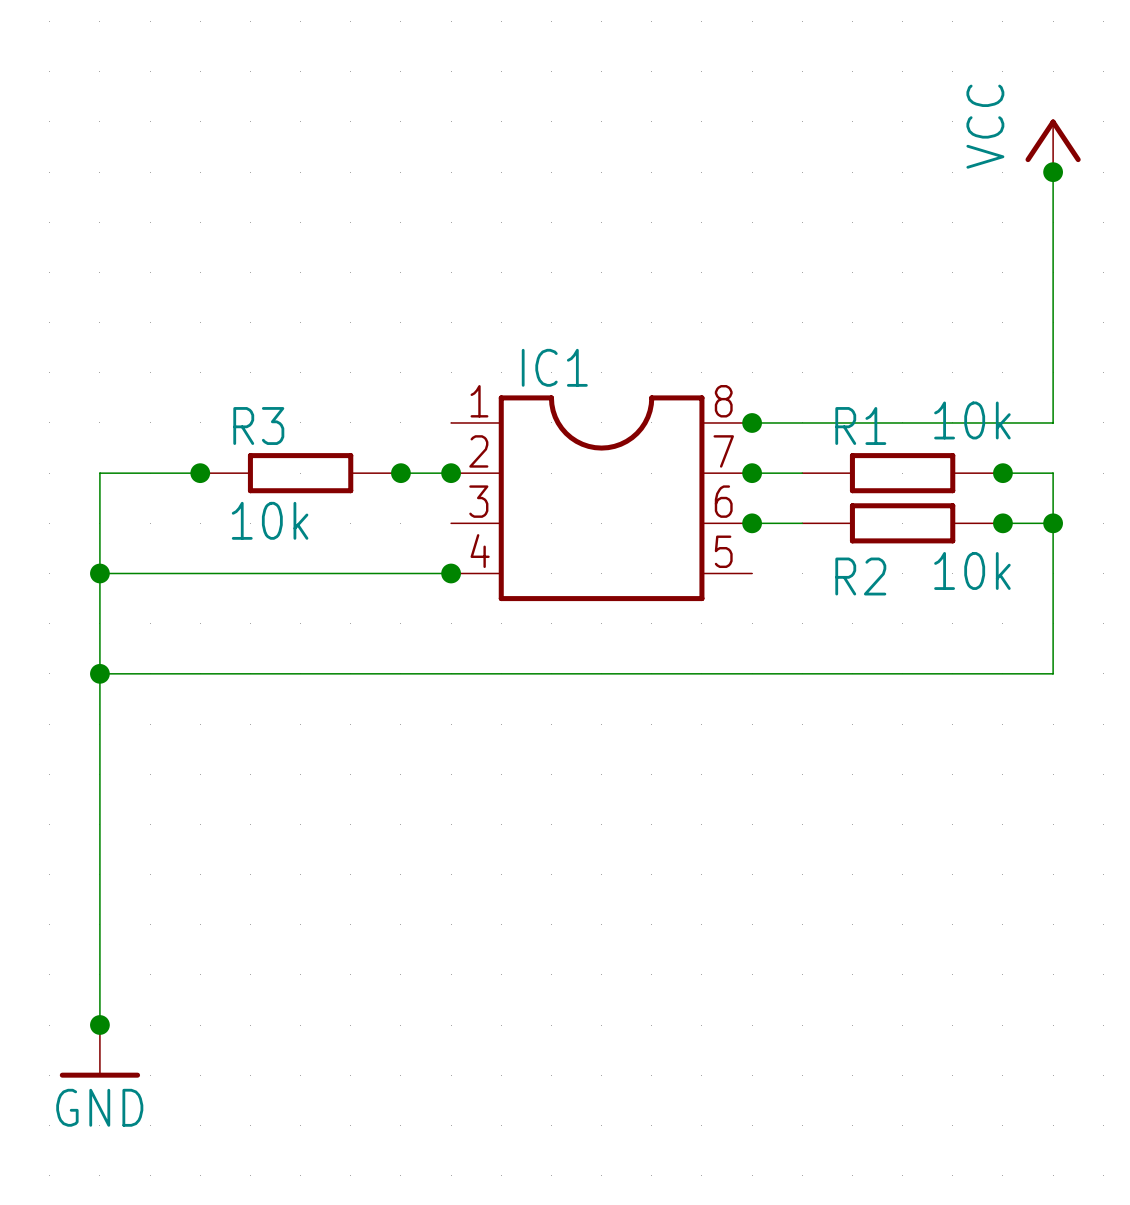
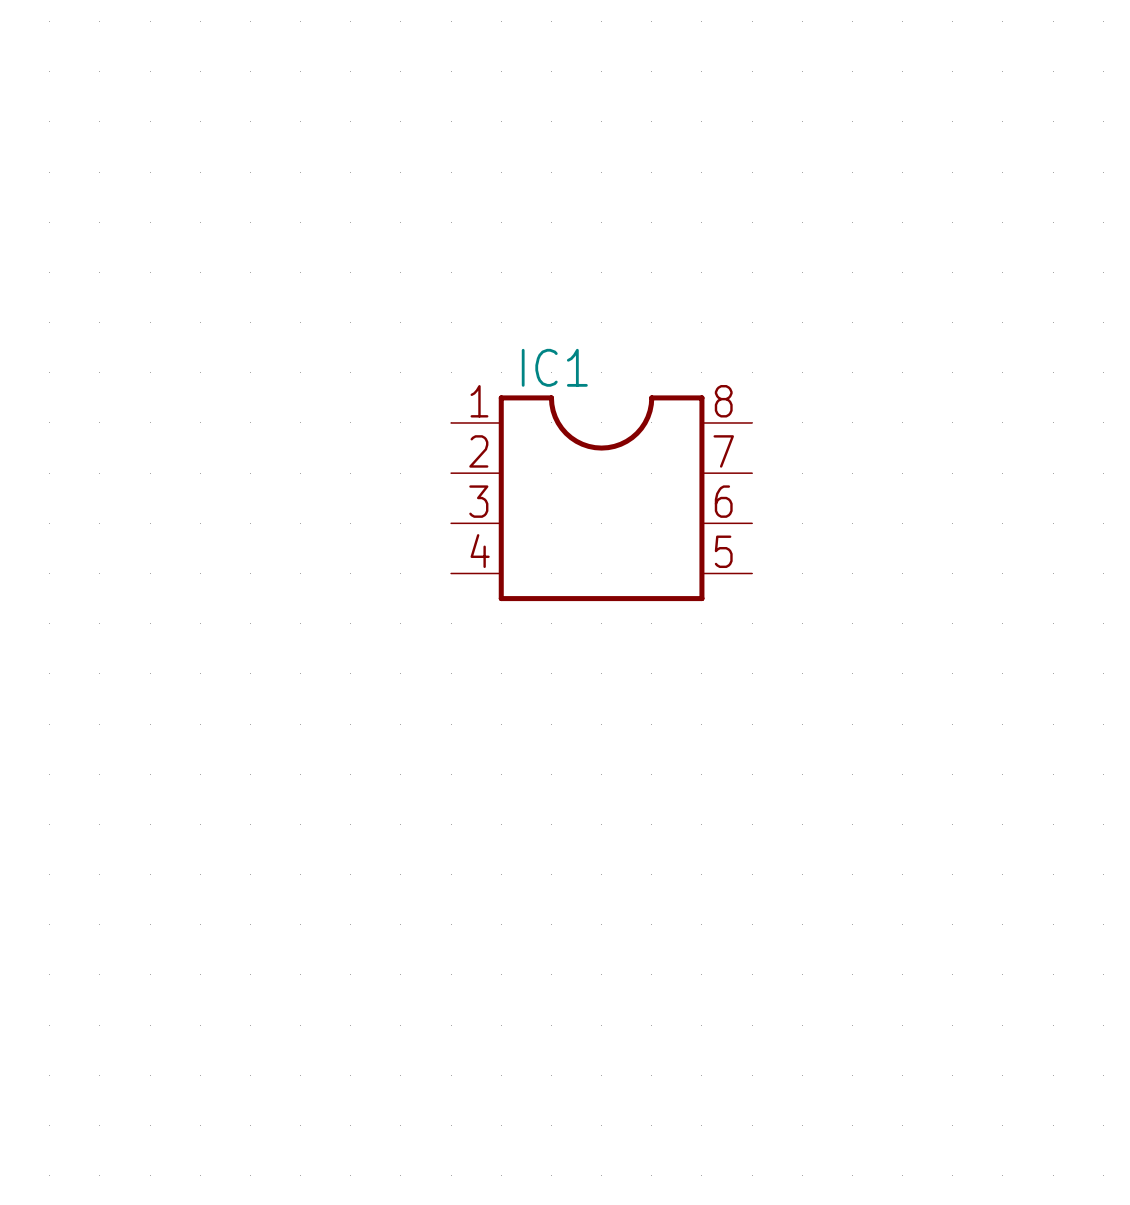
power symbol: VCC (1053, 145) -> none
wire: (1053, 172) (1053, 422) (752, 422) -> none
junction: (1053, 172) -> none
junction: (752, 422) -> none
wire: (200, 473) (99, 473) (99, 1025) -> none
junction: (200, 473) -> none
R3: 10k (300, 473) -> none
wire: (400, 473) (451, 473) -> none
junction: (400, 473) -> none
junction: (451, 473) -> none
wire: (752, 473) (802, 473) -> none
junction: (752, 473) -> none
R1: 10k (902, 473) -> none
wire: (1002, 473) (1053, 473) (1053, 673) (99, 673) -> none
junction: (1002, 473) -> none
wire: (752, 523) (802, 523) -> none
junction: (752, 523) -> none
R2: 10k (902, 523) -> none
wire: (1002, 523) (1053, 523) -> none
junction: (1002, 523) -> none
junction: (1053, 523) -> none
wire: (99, 573) (451, 573) -> none
junction: (99, 573) -> none
junction: (451, 573) -> none
junction: (99, 673) -> none
junction: (99, 1025) -> none
power symbol: GND (99, 1051) -> none

